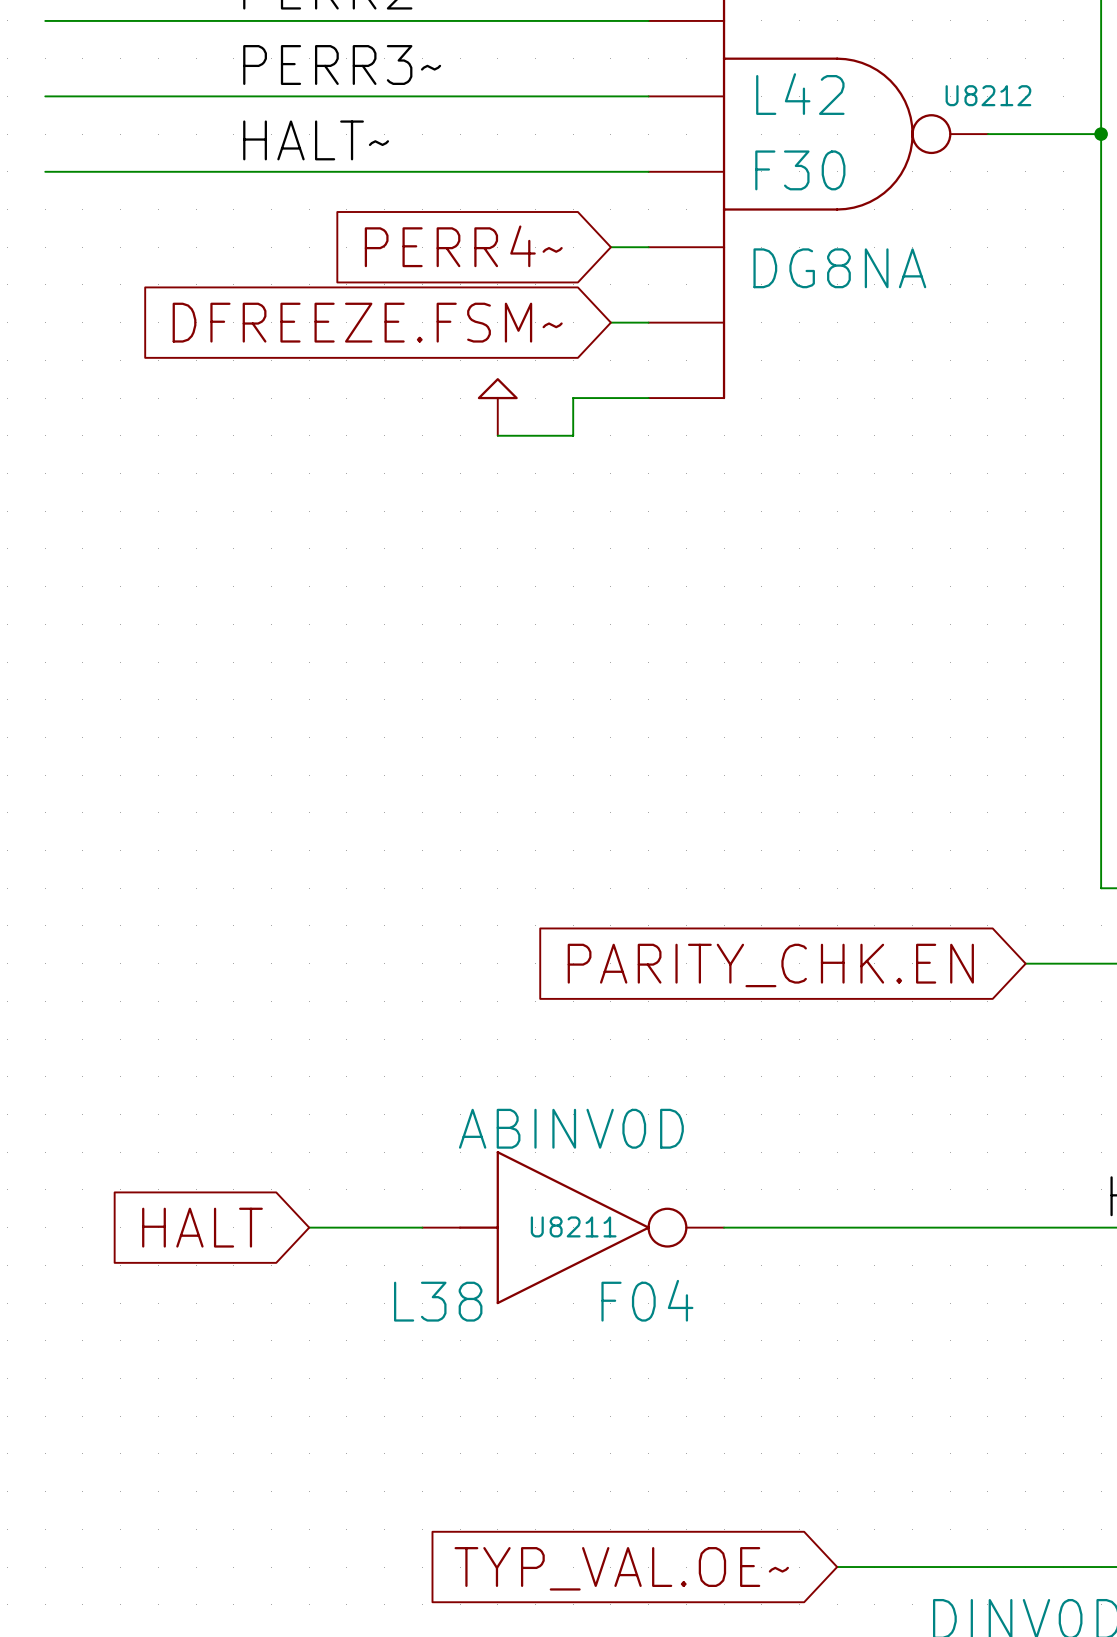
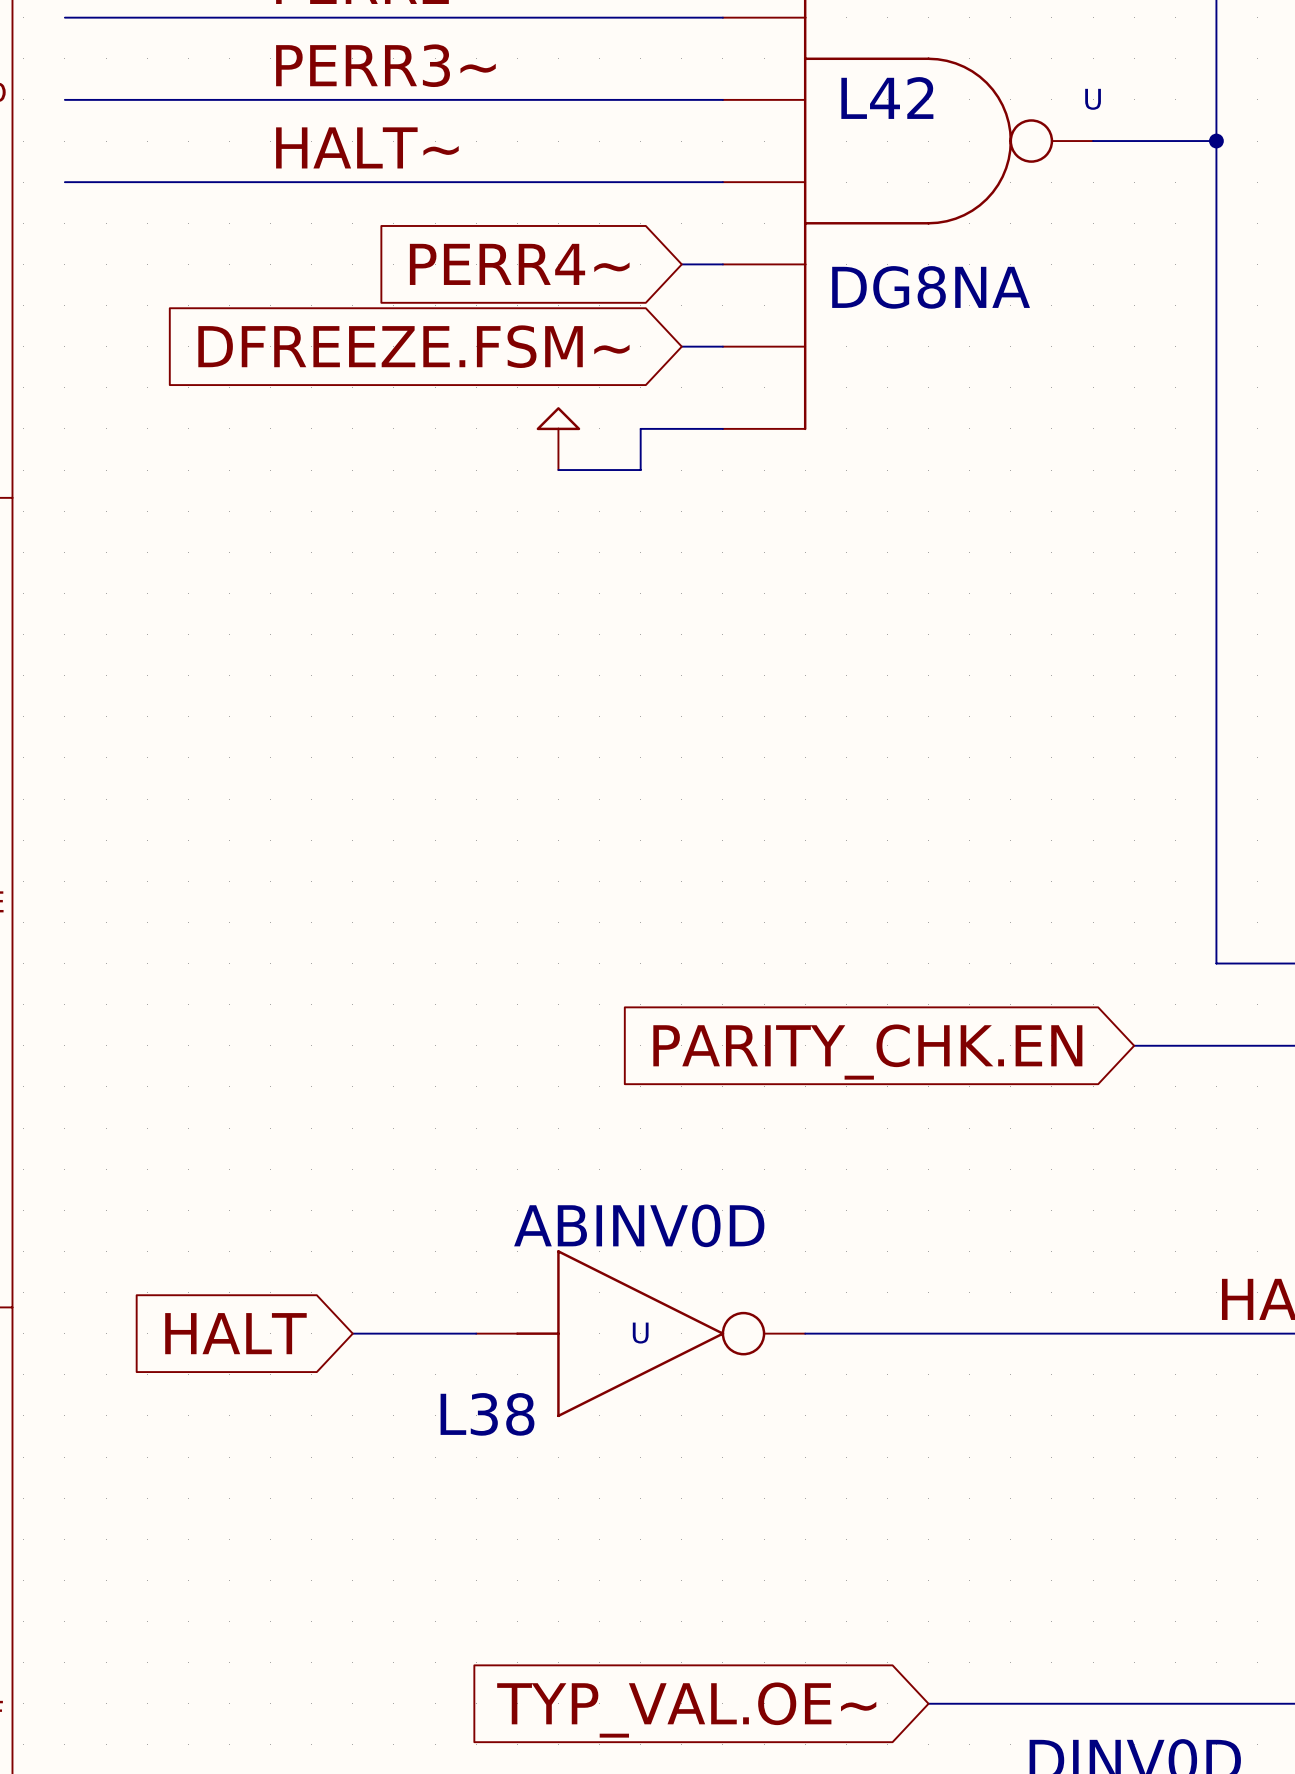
U8212 name: U8212 (988, 95) -> U (1093, 99)
U8212 value: F30 (800, 170) -> none
U8211 name: U8211 (573, 1226) -> U (640, 1333)
U8211 value: F04 (647, 1300) -> none

